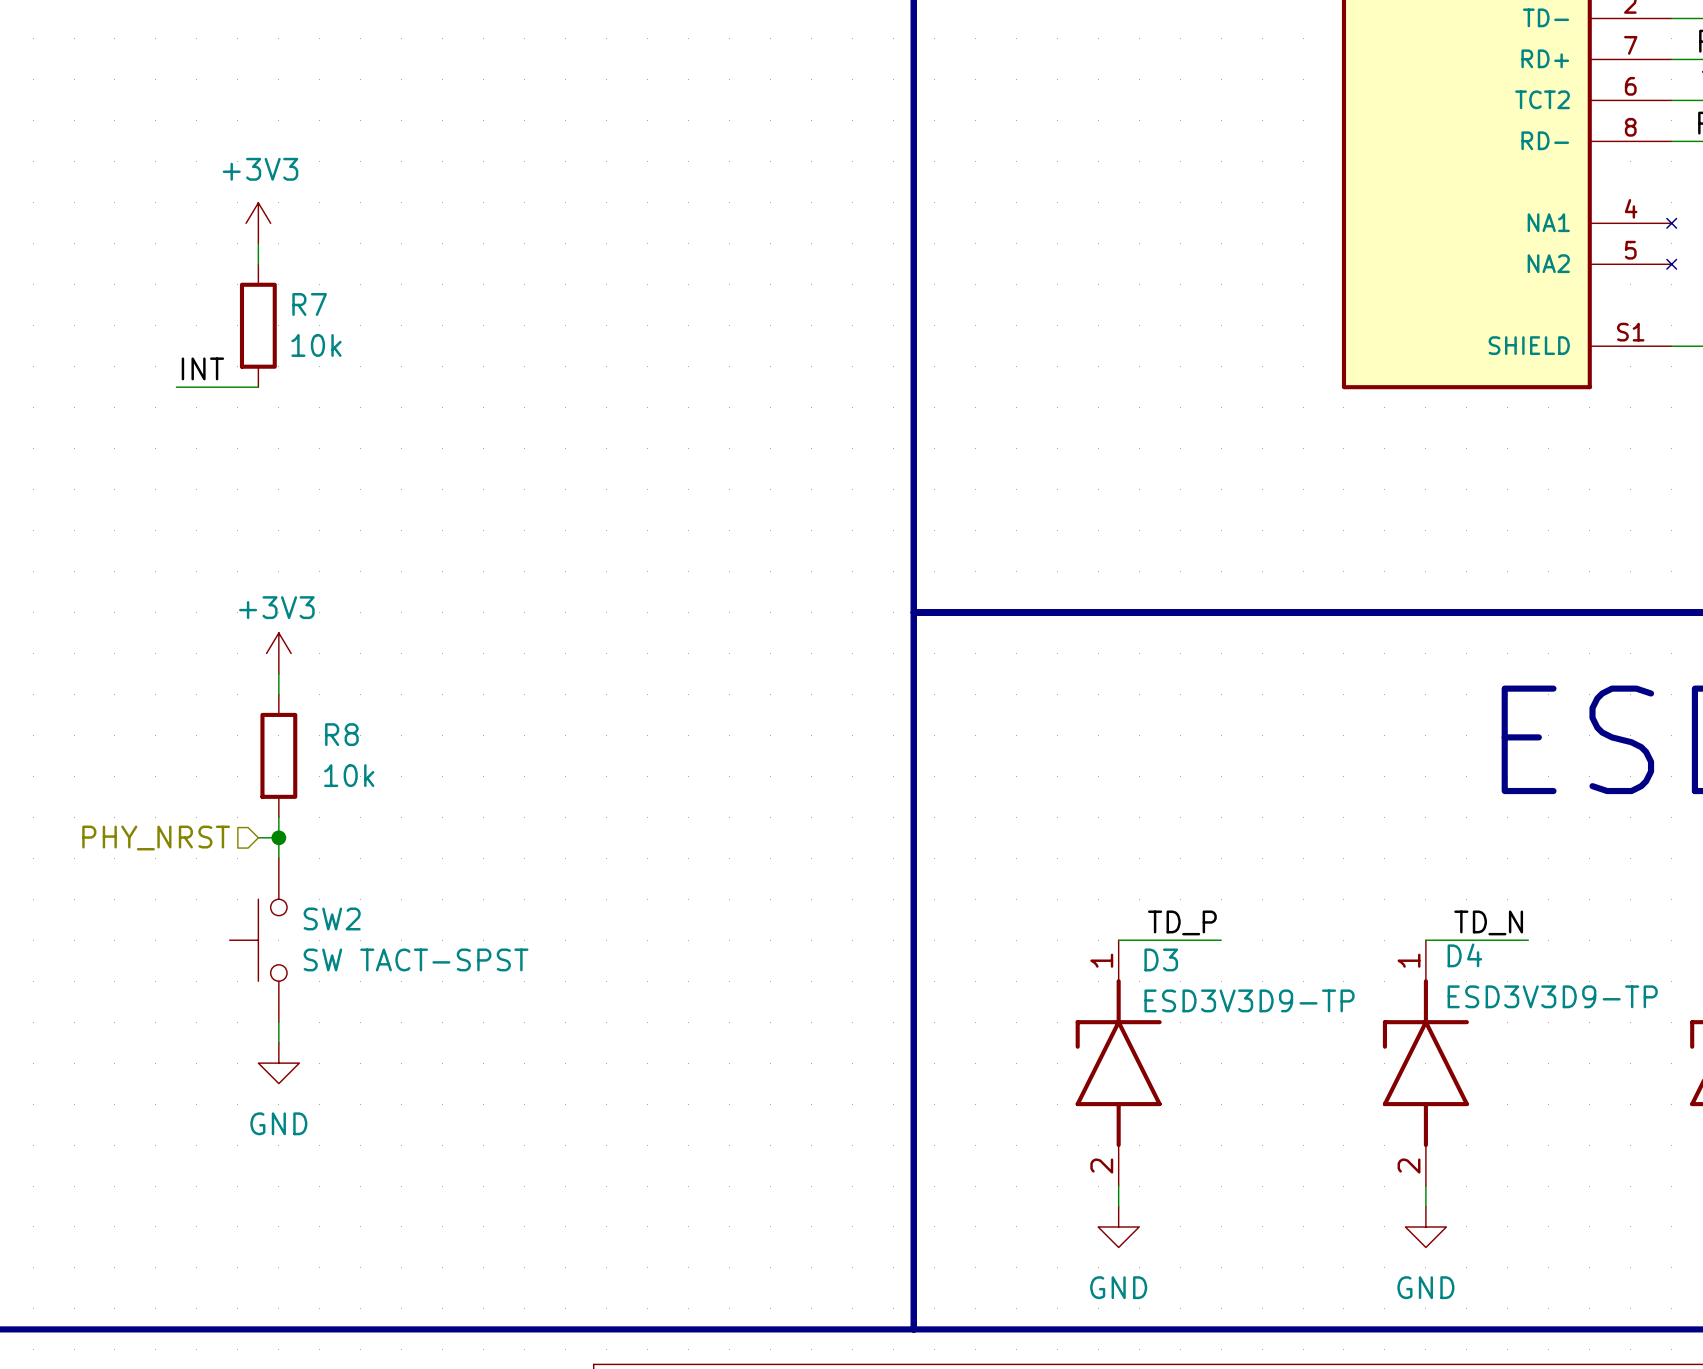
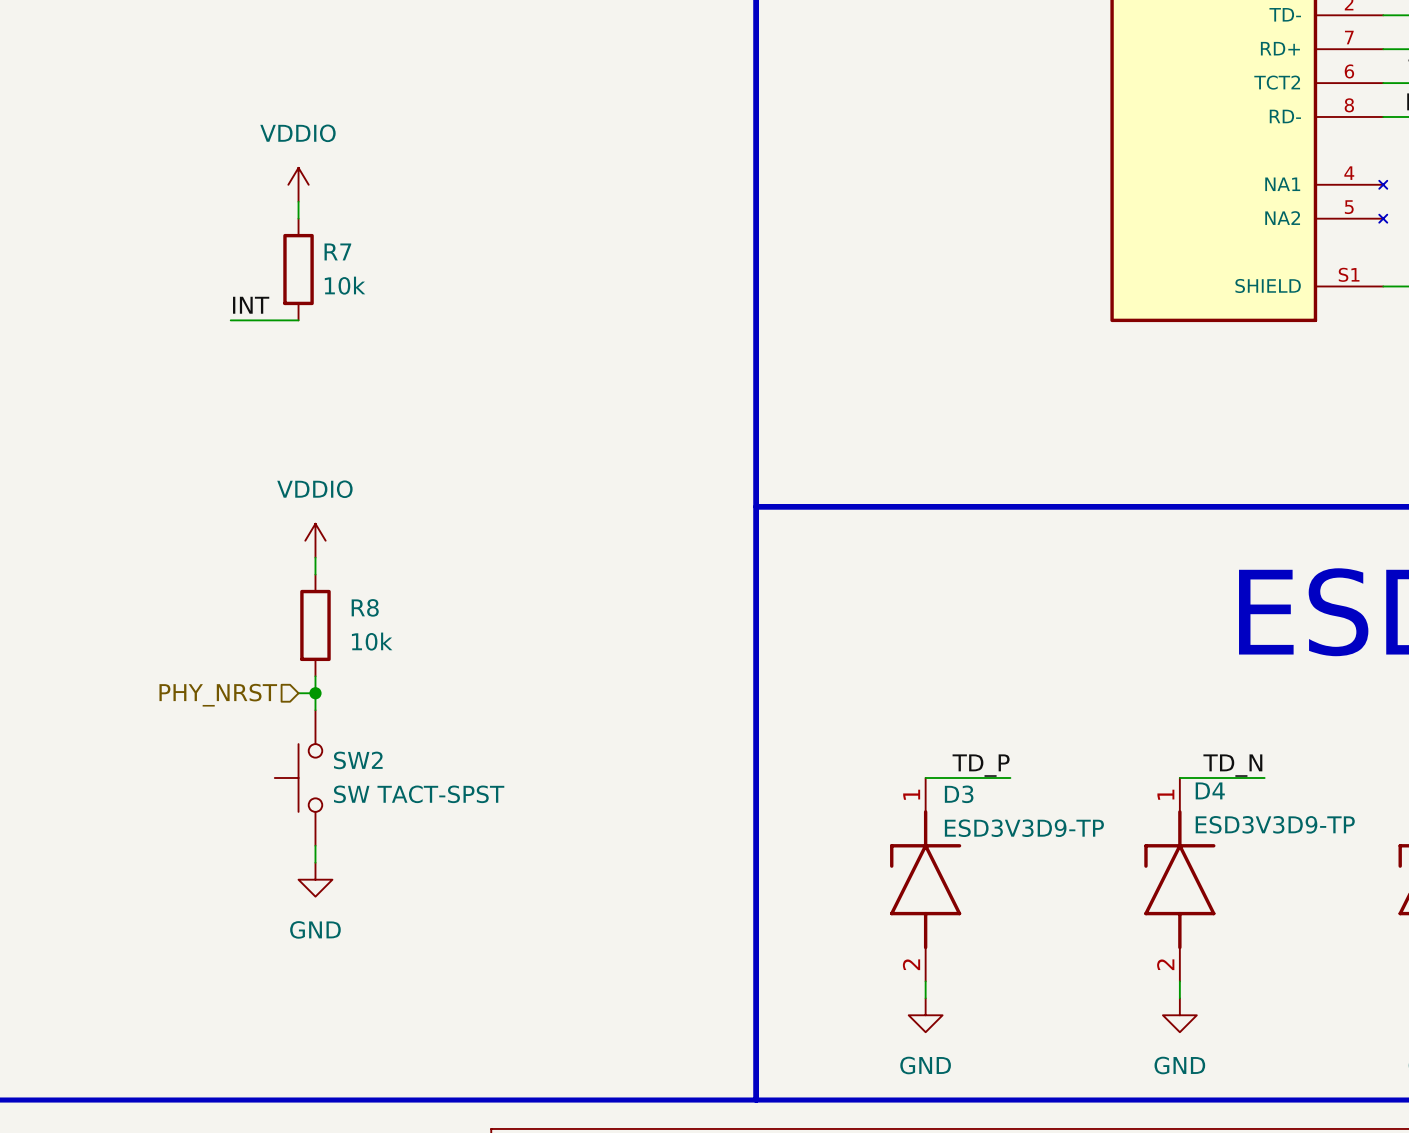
power symbol: +3V3 (258, 223) -> none
power symbol: none -> VDDIO (298, 184)
wire: (258, 243) (258, 264) -> (298, 201) (298, 218)
R7 position: (258, 325) -> (298, 269)
label position: INT (202, 368) -> INT (251, 305)
wire: (176, 387) (258, 387) -> (230, 320) (298, 320)
power symbol: +3V3 (278, 653) -> none
power symbol: none -> VDDIO (315, 540)
wire: (278, 673) (278, 694) -> (315, 557) (315, 574)
R8 position: (278, 755) -> (315, 625)
wire: (278, 817) (278, 858) -> (315, 676) (315, 710)
wire: (258, 837) (278, 837) -> (298, 693) (315, 693)
junction: (278, 837) -> none
junction: none -> (315, 693)
hierarchical label position: PHY_NRST (156, 838) -> PHY_NRST (218, 695)
SW2 position: (258, 940) -> (298, 777)
wire: (278, 1022) (278, 1042) -> (315, 845) (315, 862)
power symbol position: GND (278, 1063) -> GND (315, 879)

